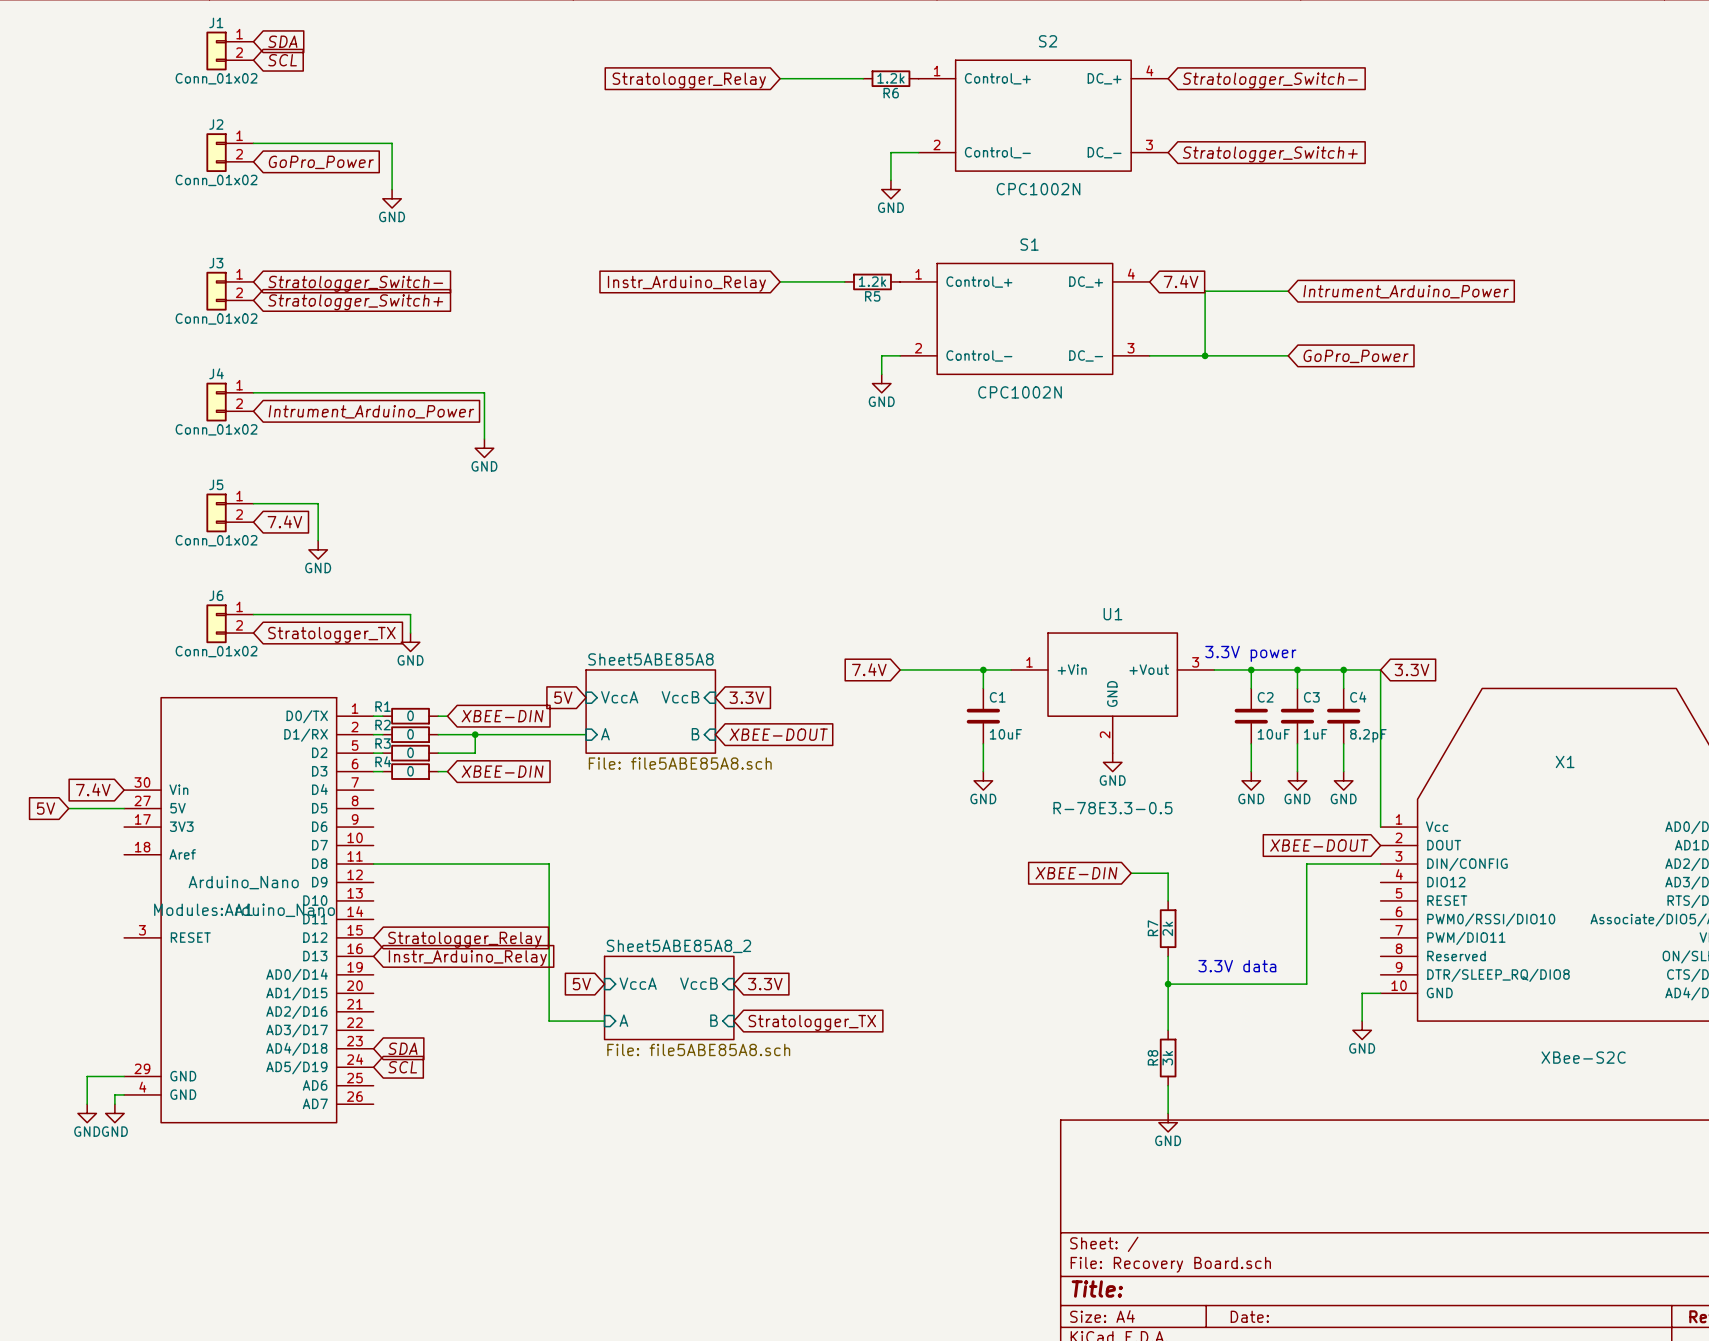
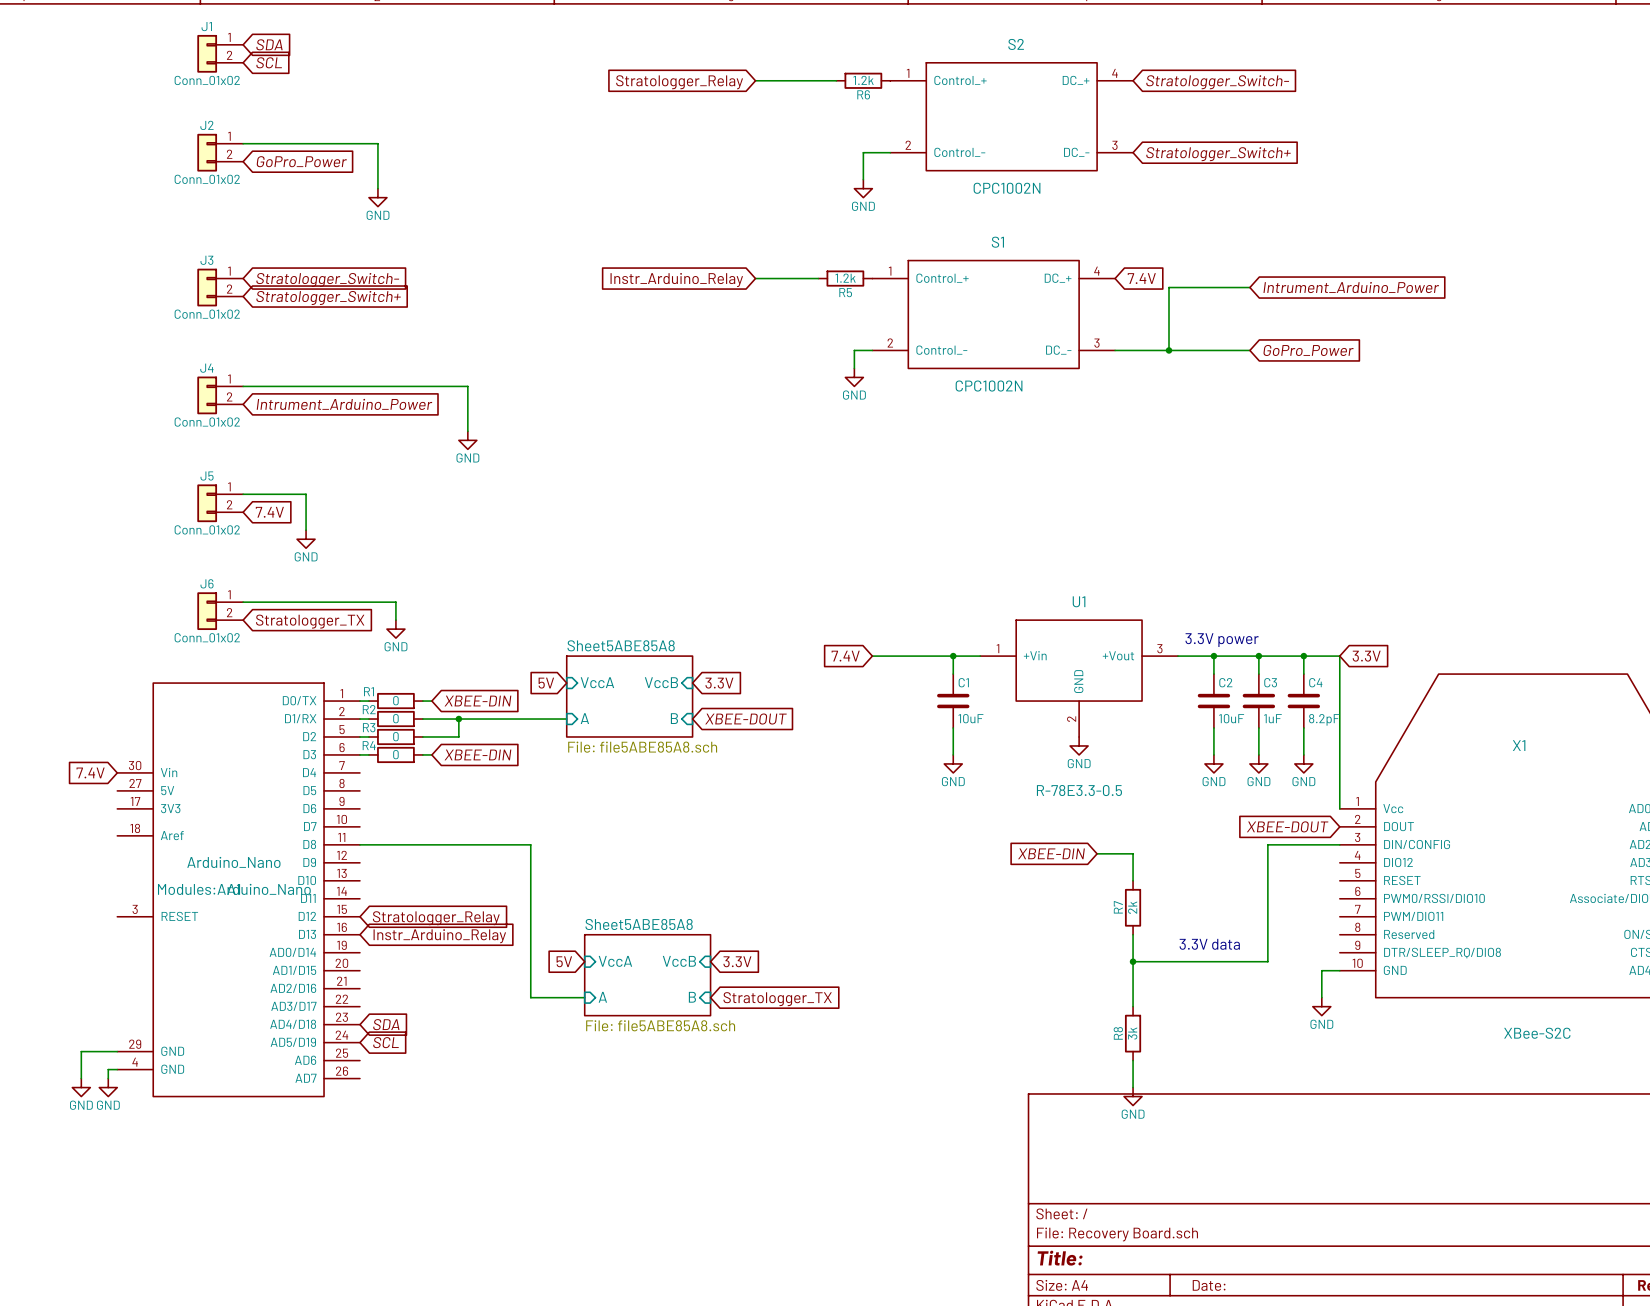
global label: 5V (46, 808) -> none
wire: (68, 808) (124, 808) -> none
sheet Sheet5ABE85A8_2 name: Sheet5ABE85A8_2 (678, 946) -> Sheet5ABE85A8 (639, 924)

